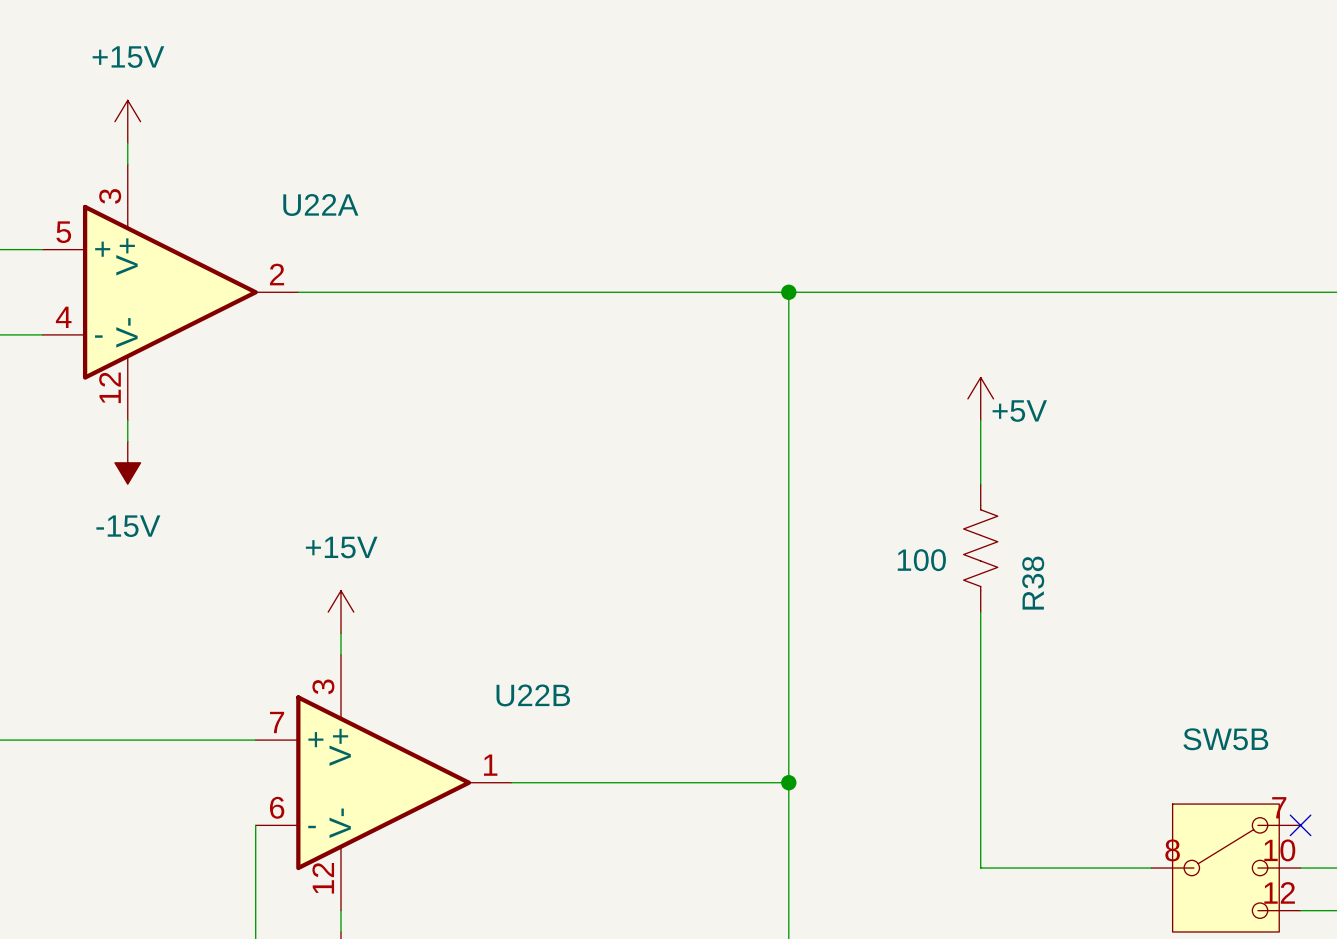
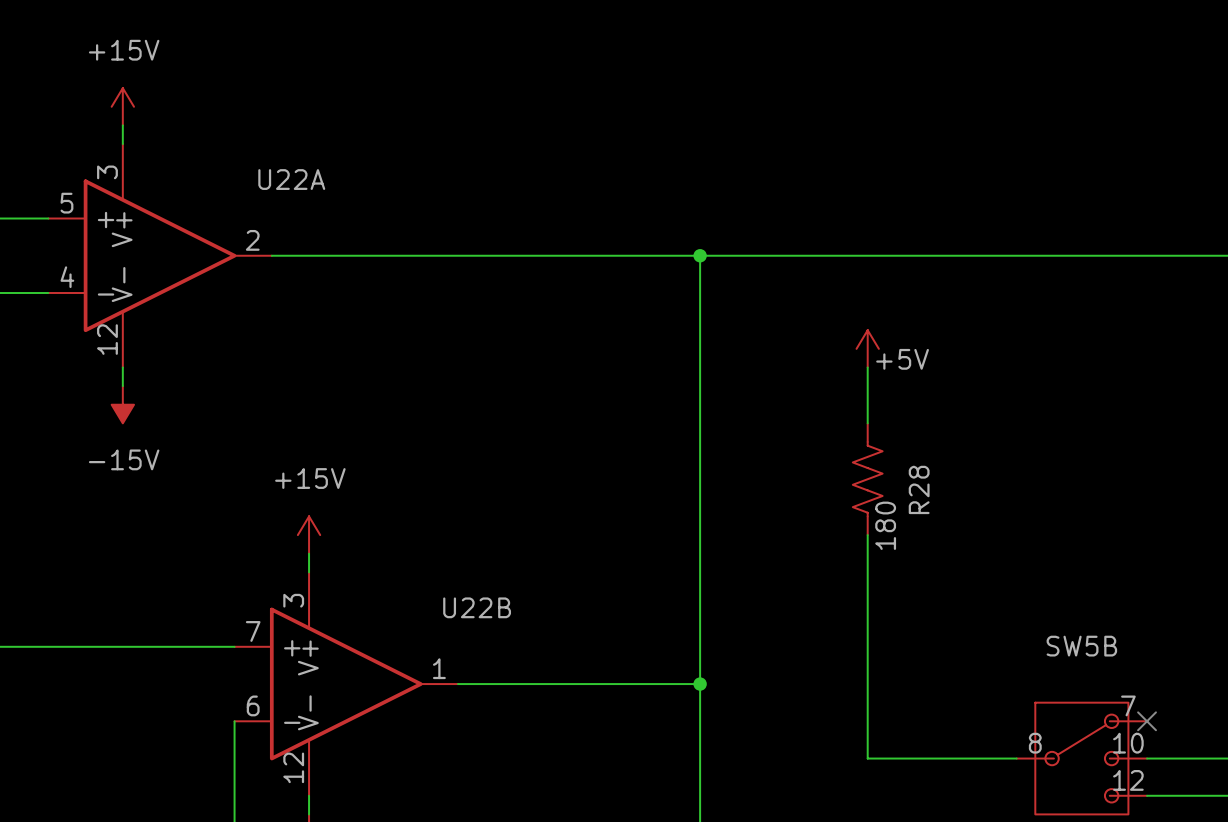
R38 value: 100 (921, 560) -> 180 (885, 525)
R38 name: R38 (1033, 583) -> R28 (919, 489)

